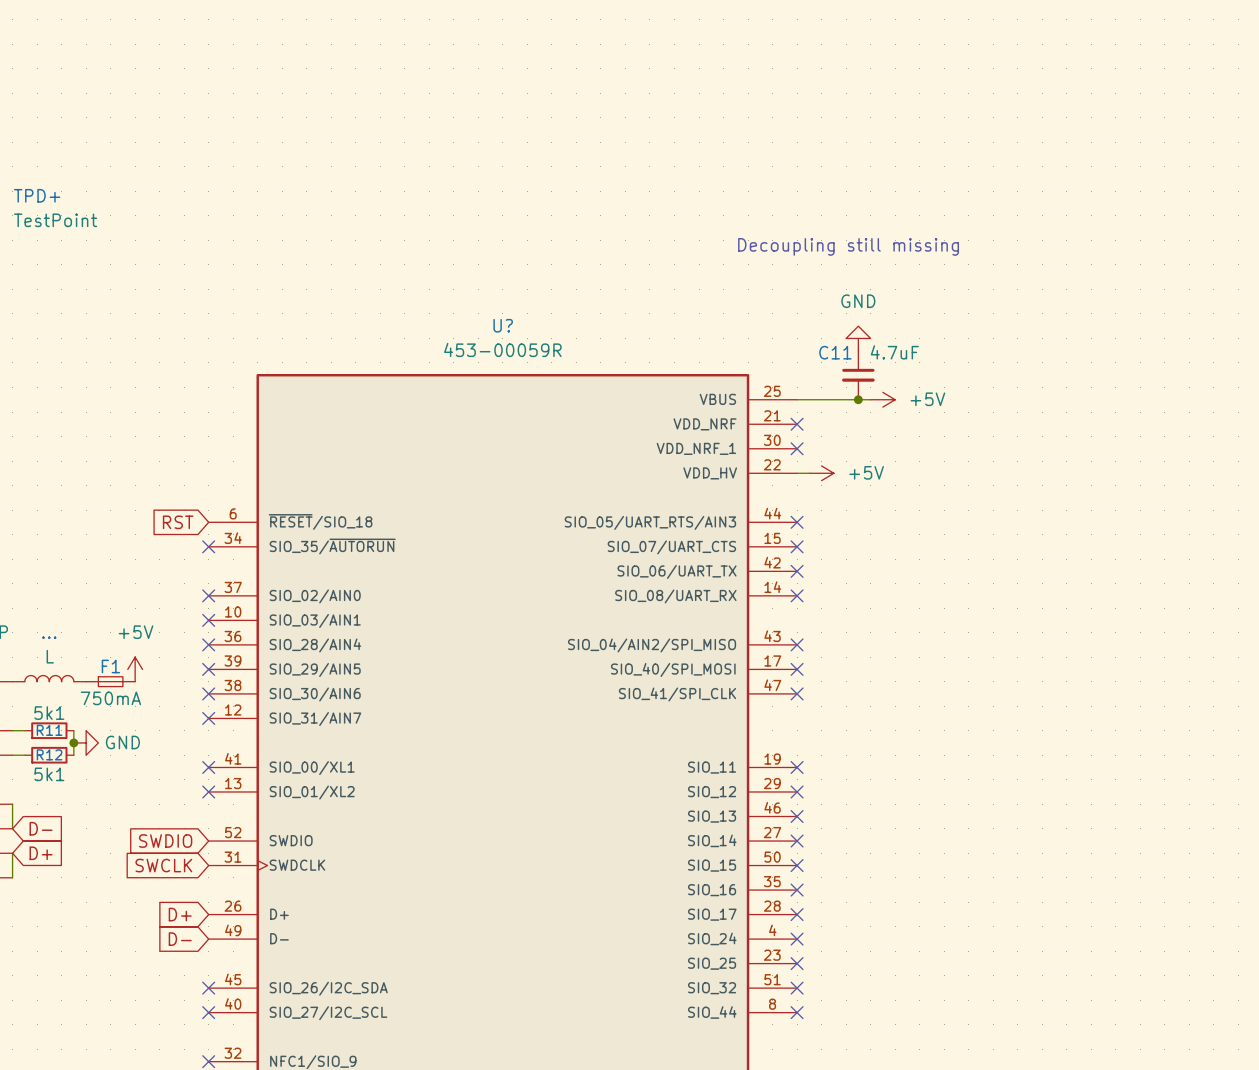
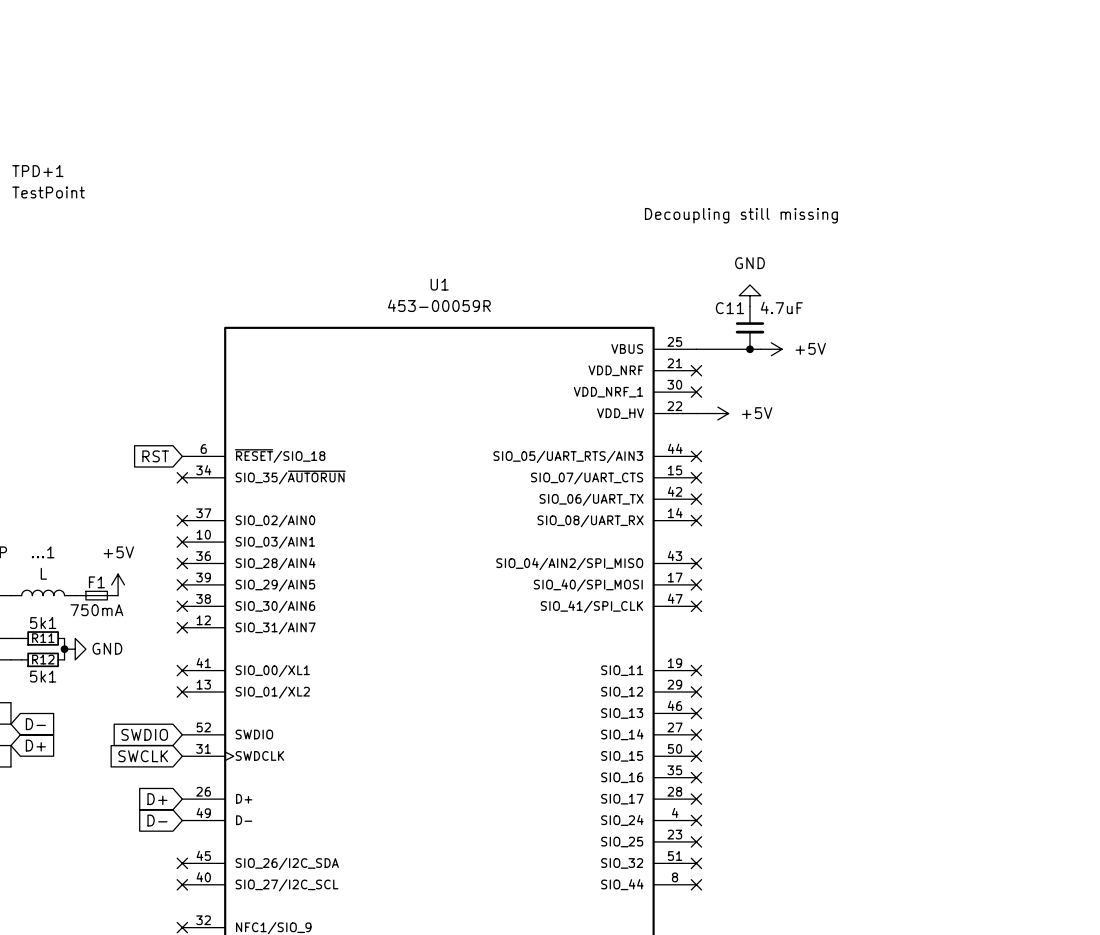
TPD+ name: TPD+ (37, 195) -> TPD+1 (37, 171)
U? name: U? (503, 325) -> U1 (439, 284)
...1 name: ... (49, 637) -> ...1 (43, 552)

